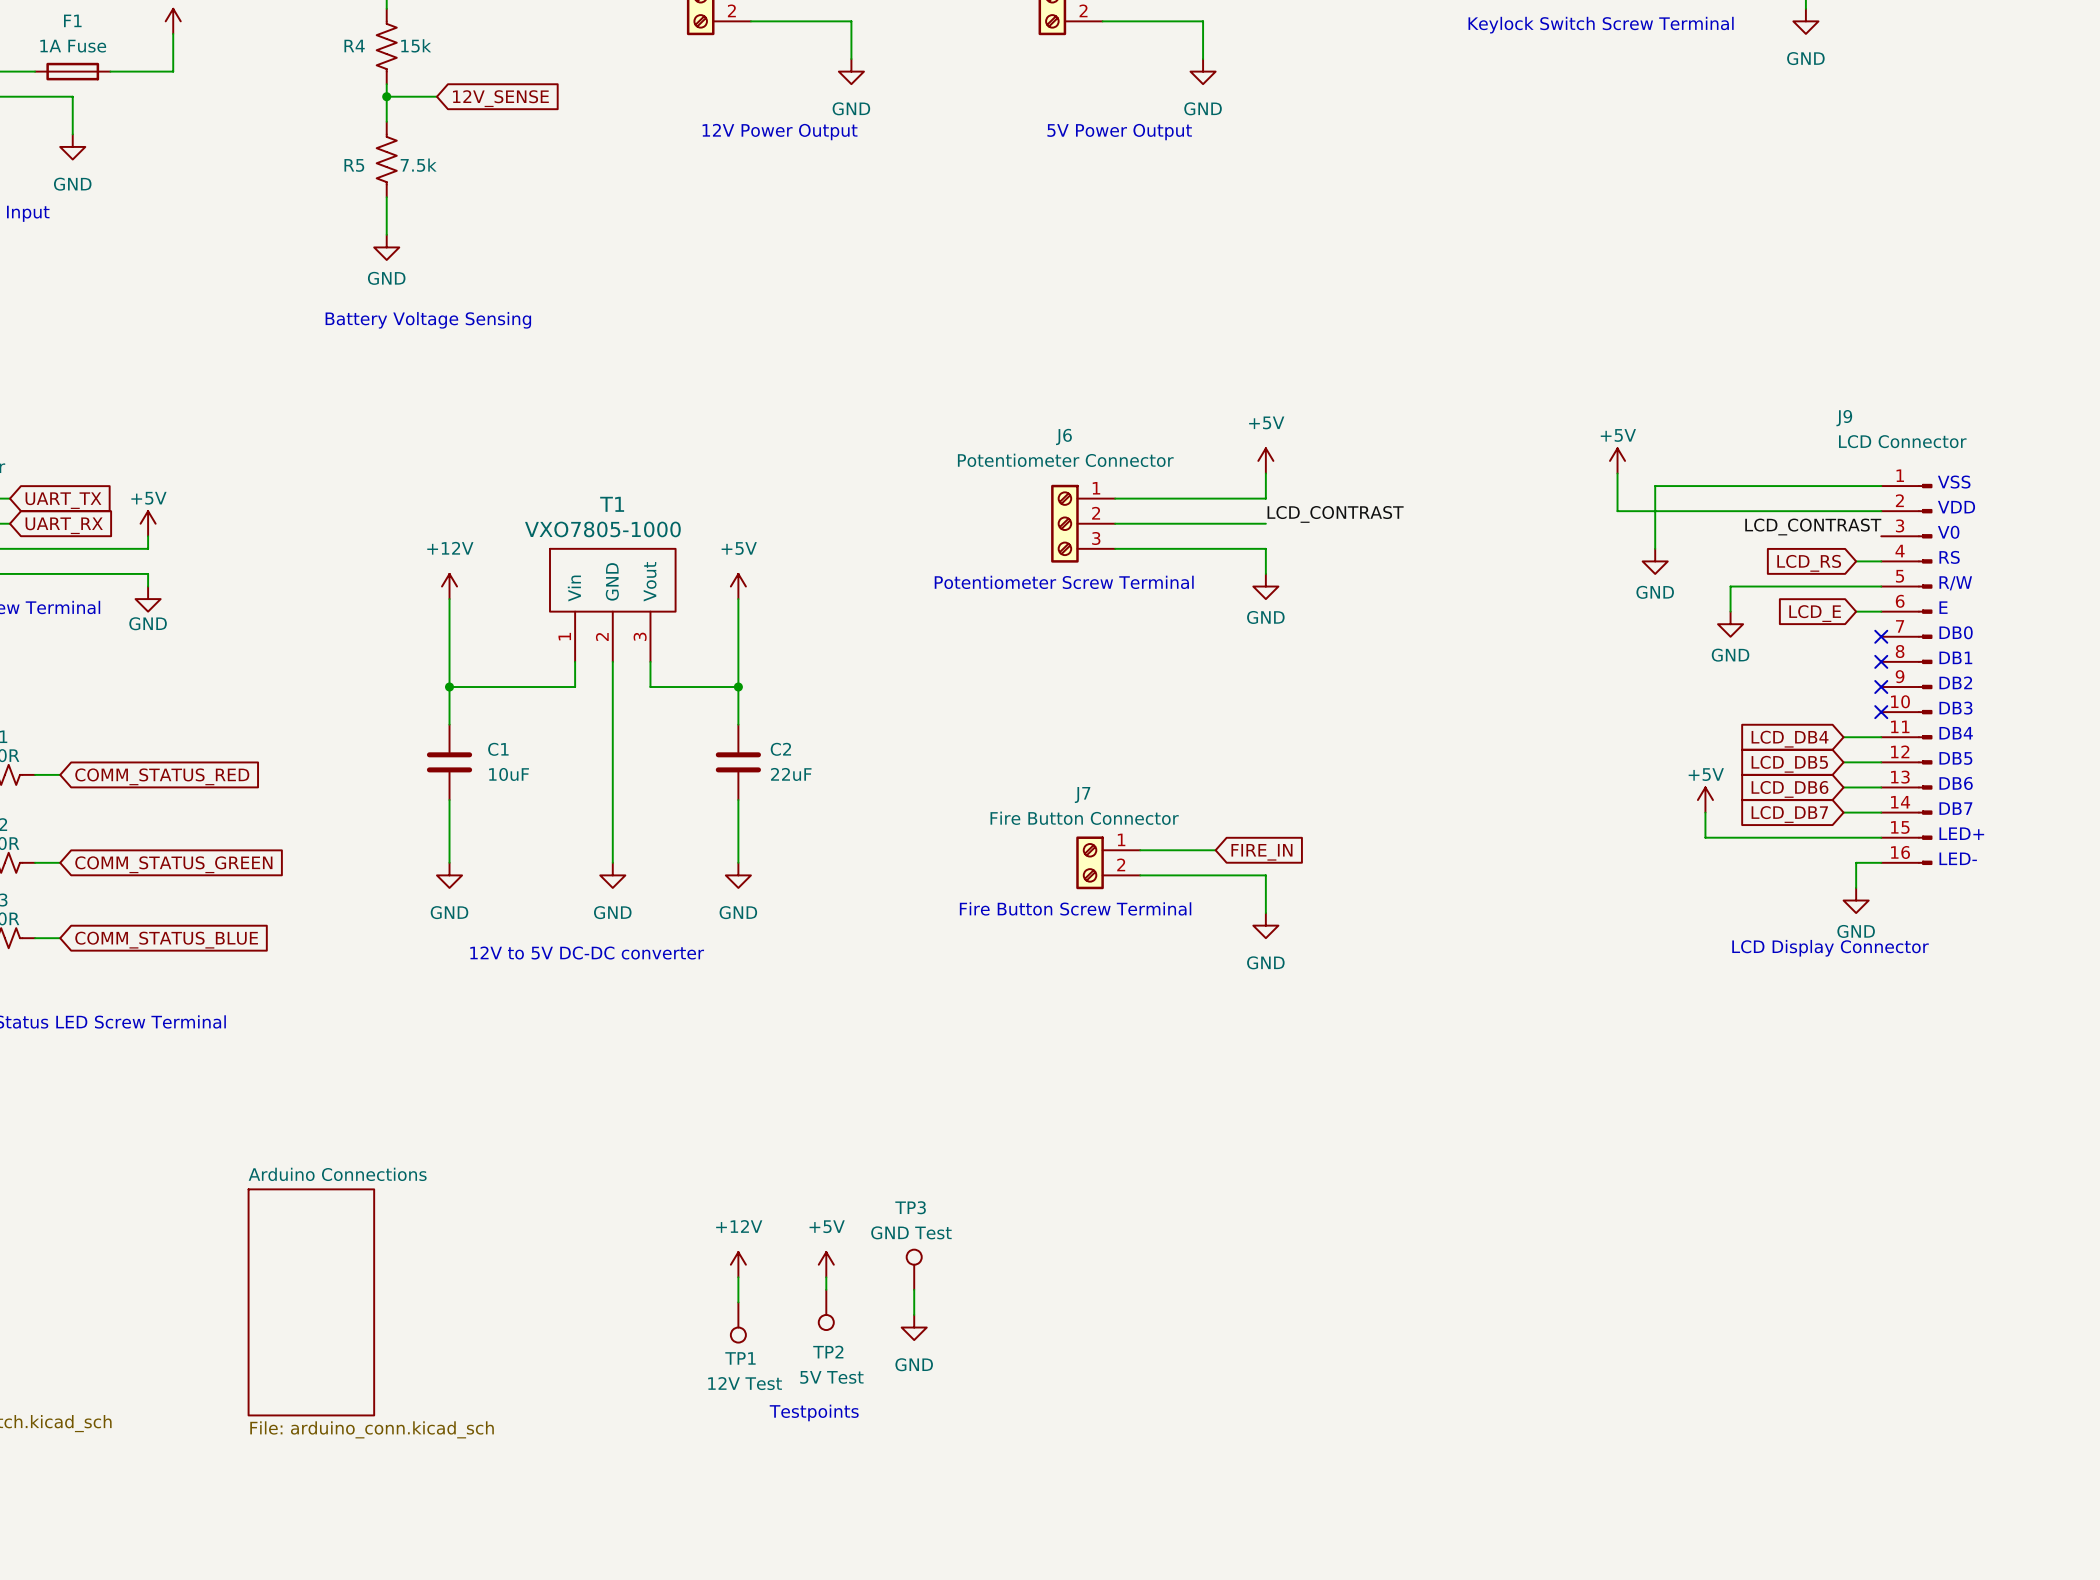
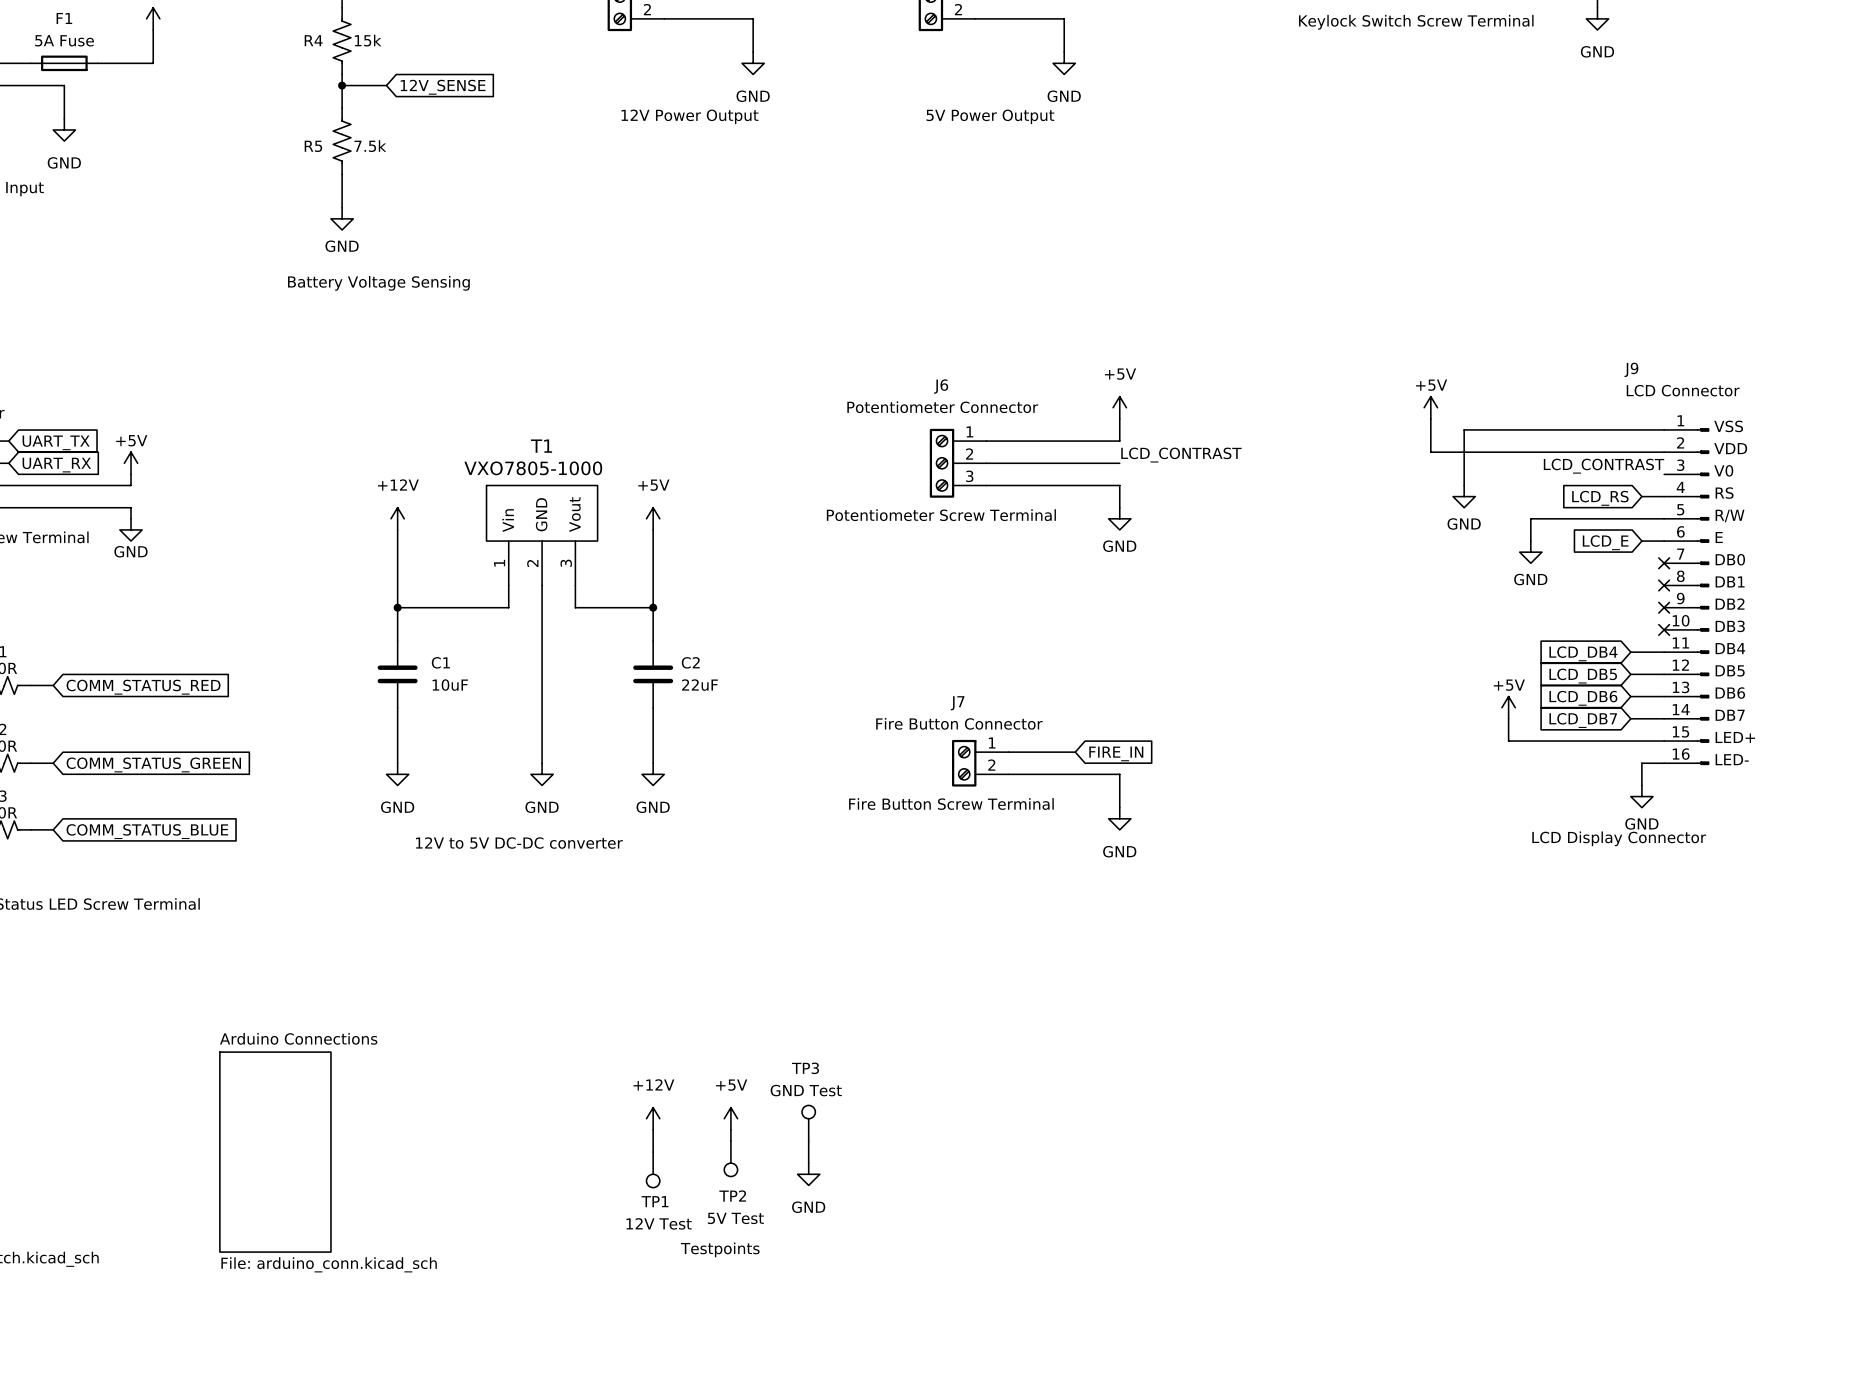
F1 value: 1A Fuse (73, 46) -> 5A Fuse (64, 40)

